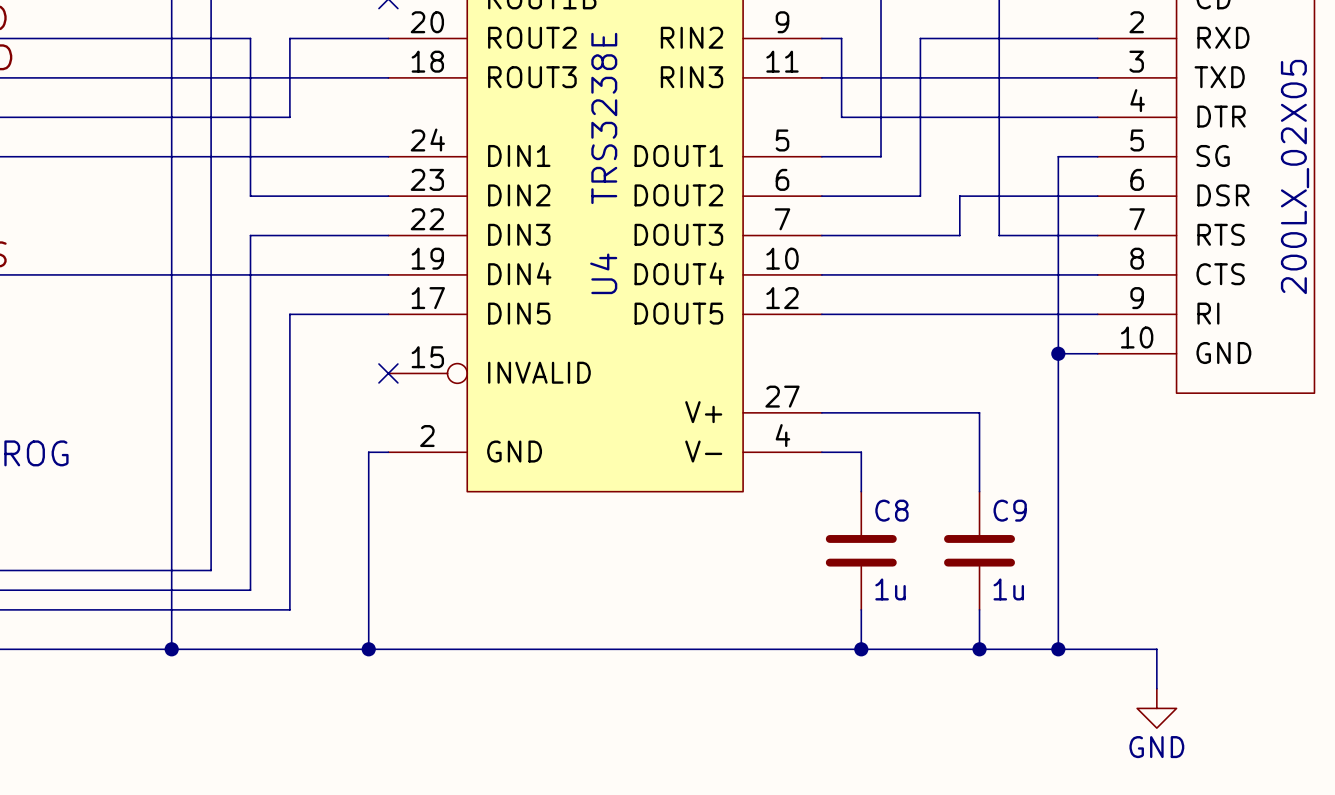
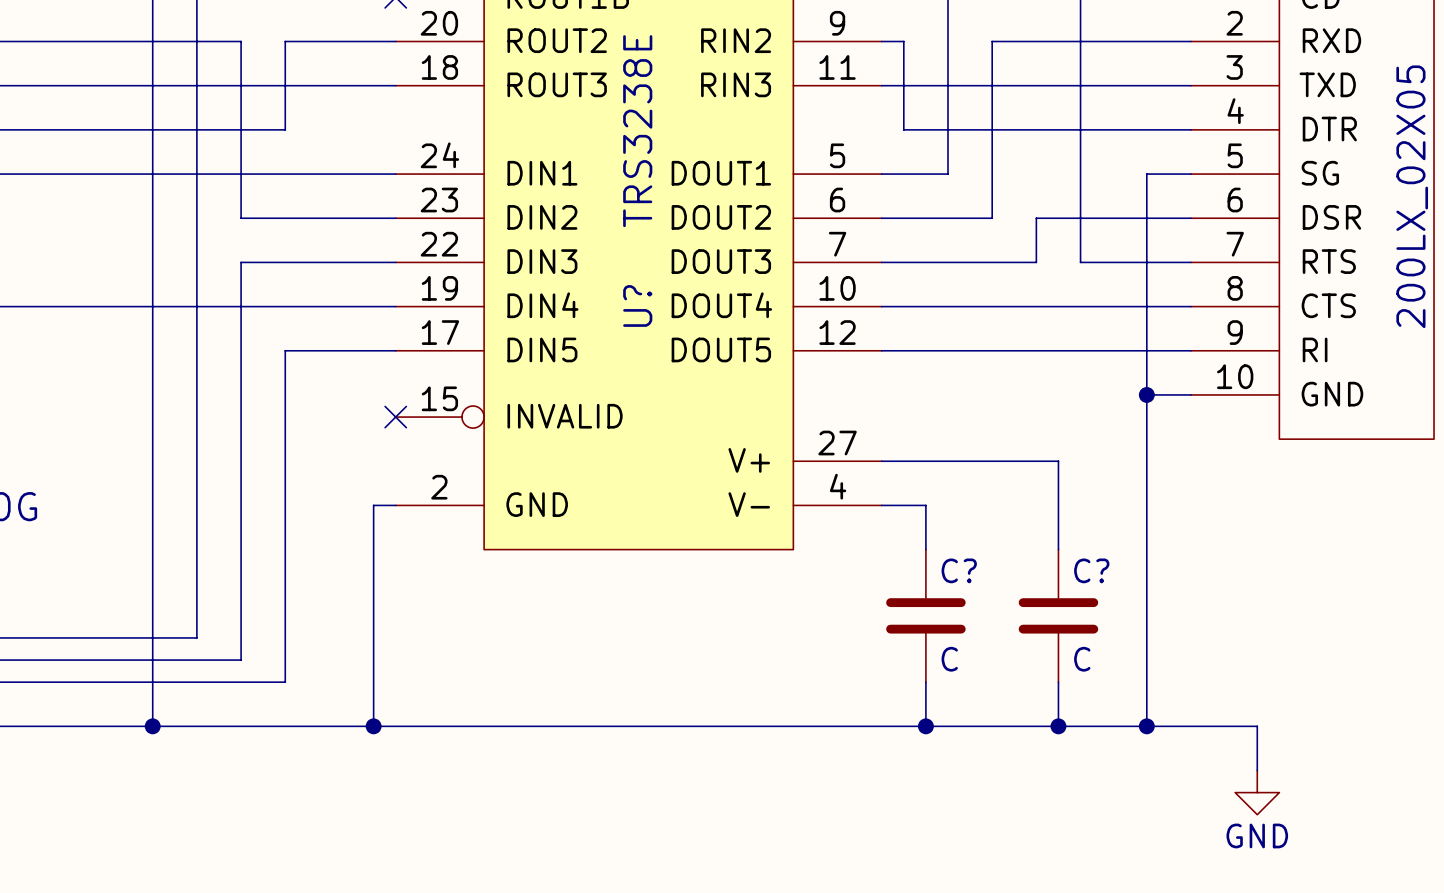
U4 name: U4 (603, 273) -> U? (637, 305)
C8 name: C8 (891, 510) -> C? (959, 570)
C9 name: C9 (1010, 510) -> C? (1091, 570)
C8 value: 1u (890, 589) -> C (949, 659)
C9 value: 1u (1008, 589) -> C (1082, 659)

